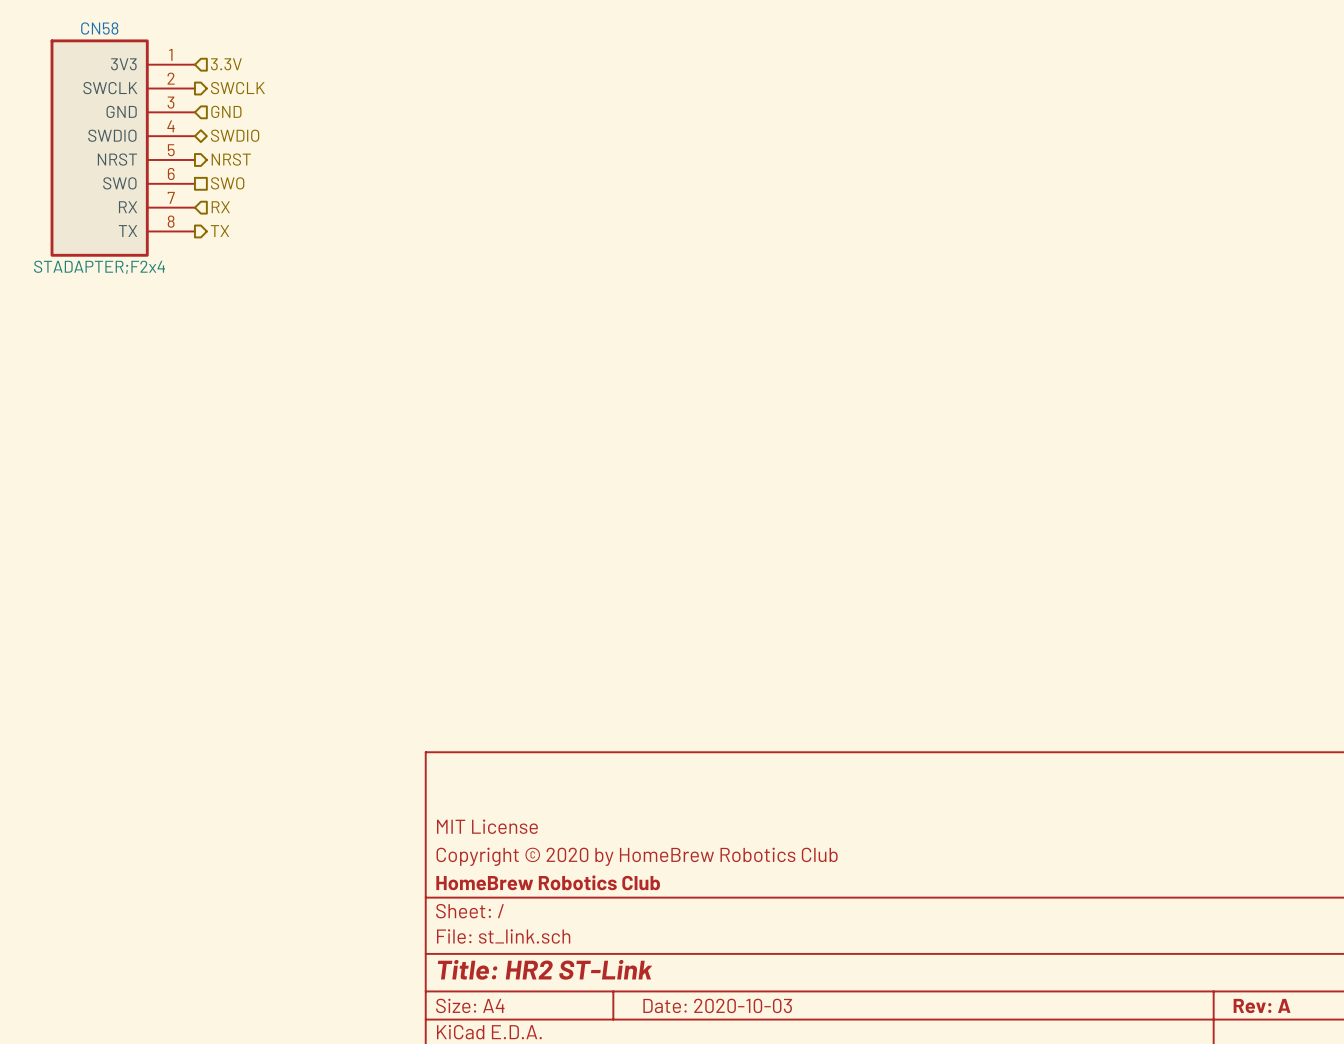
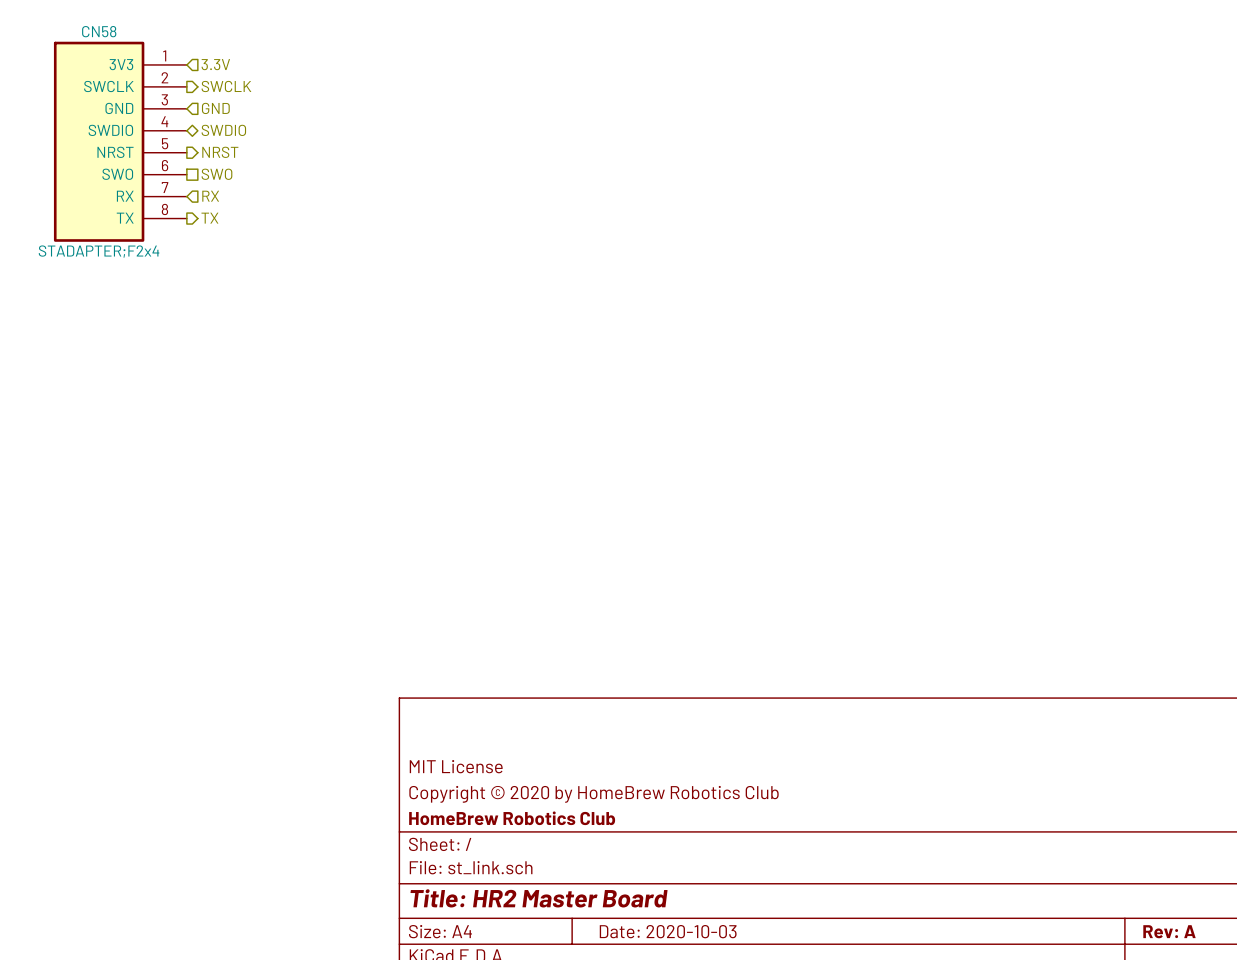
title block: Title: HR2 ST-Link (544, 969) -> Title: HR2 Master Board (539, 898)

